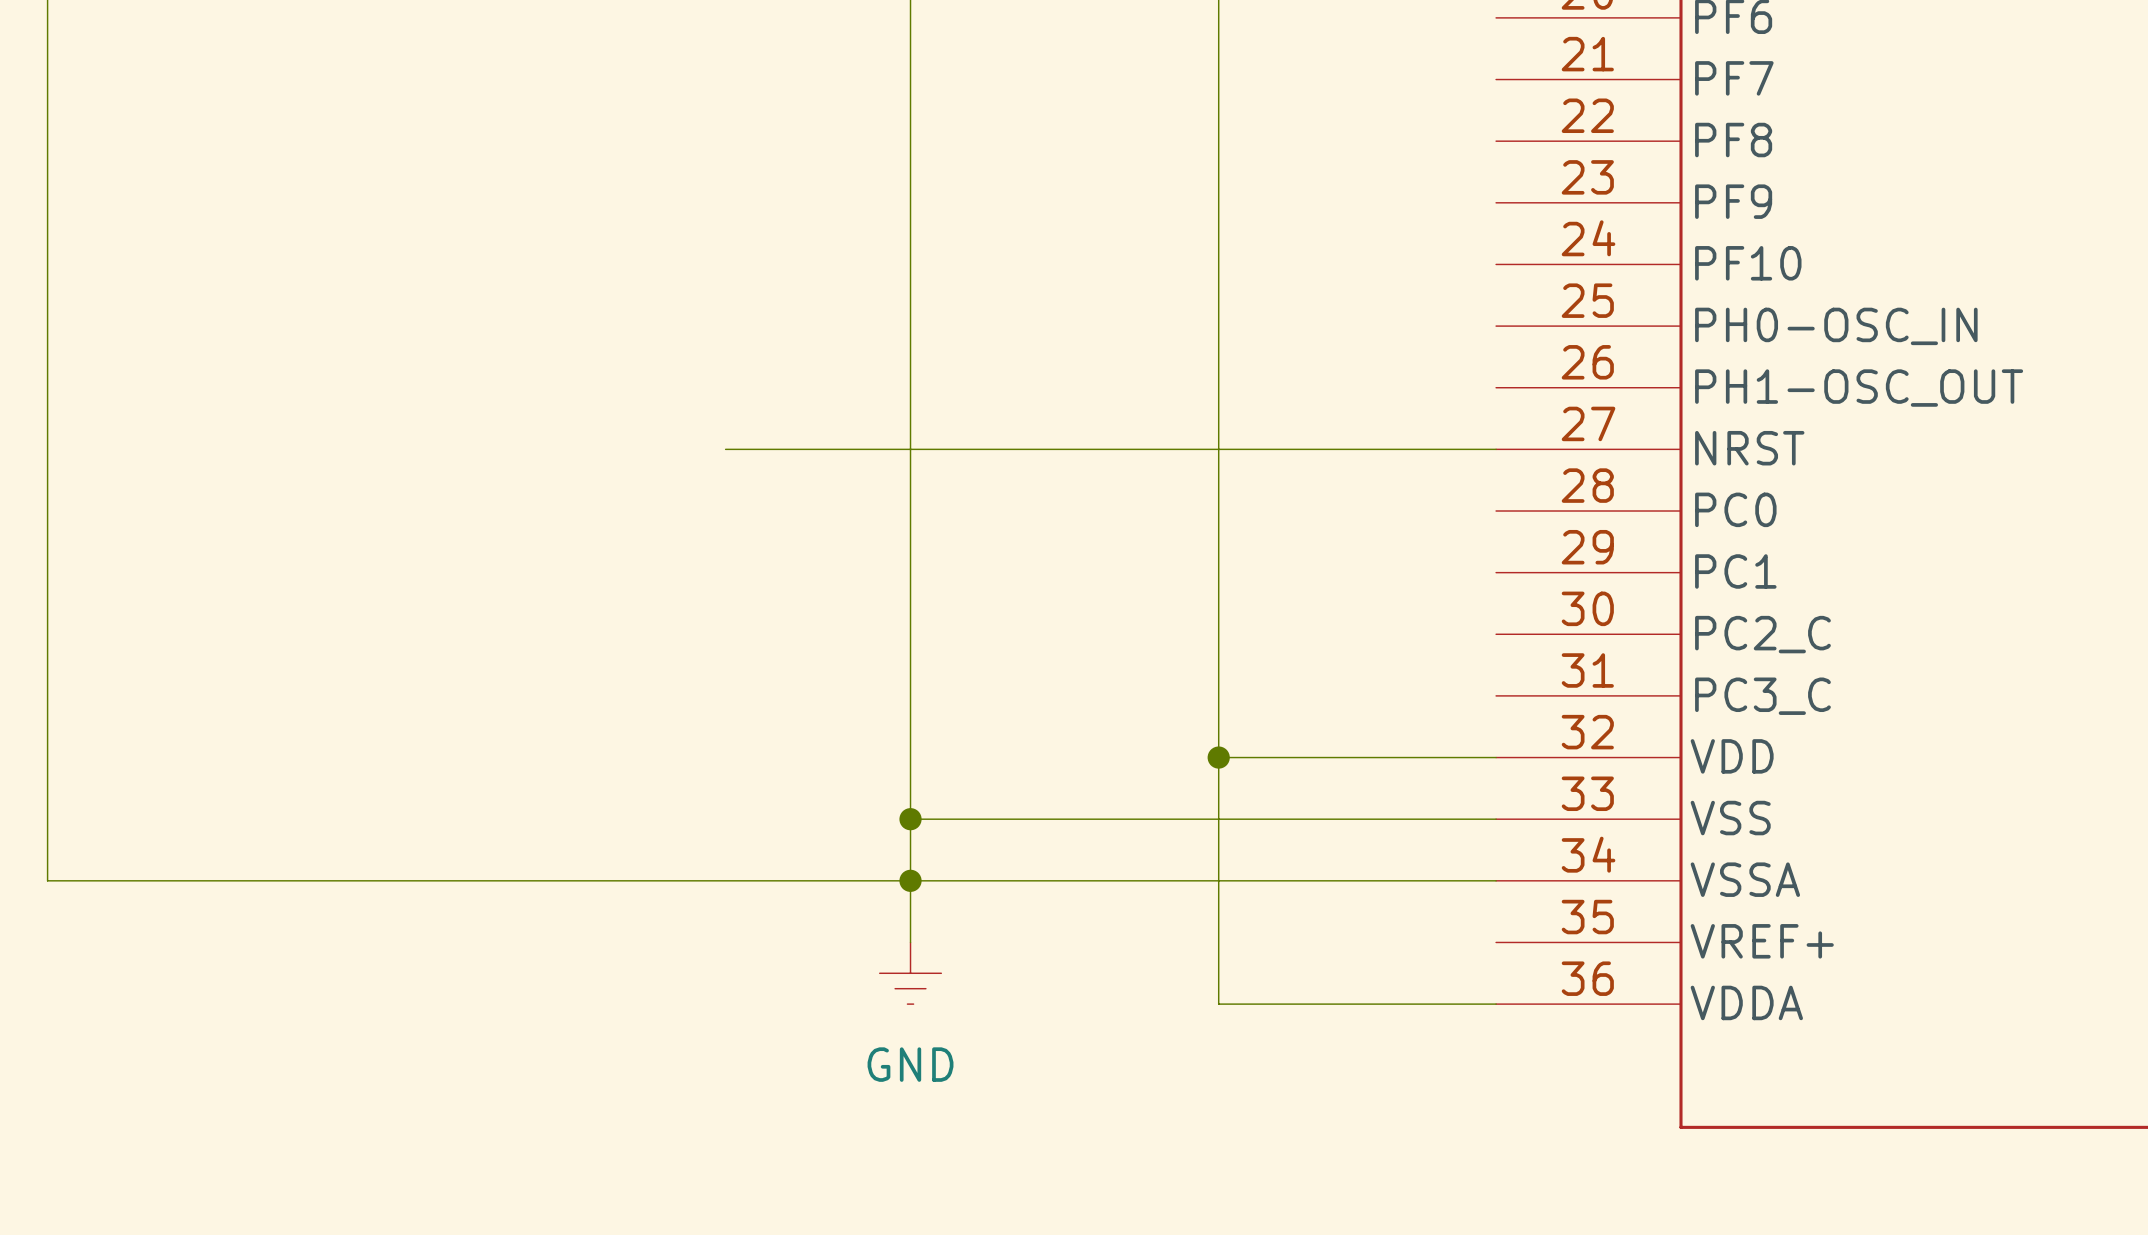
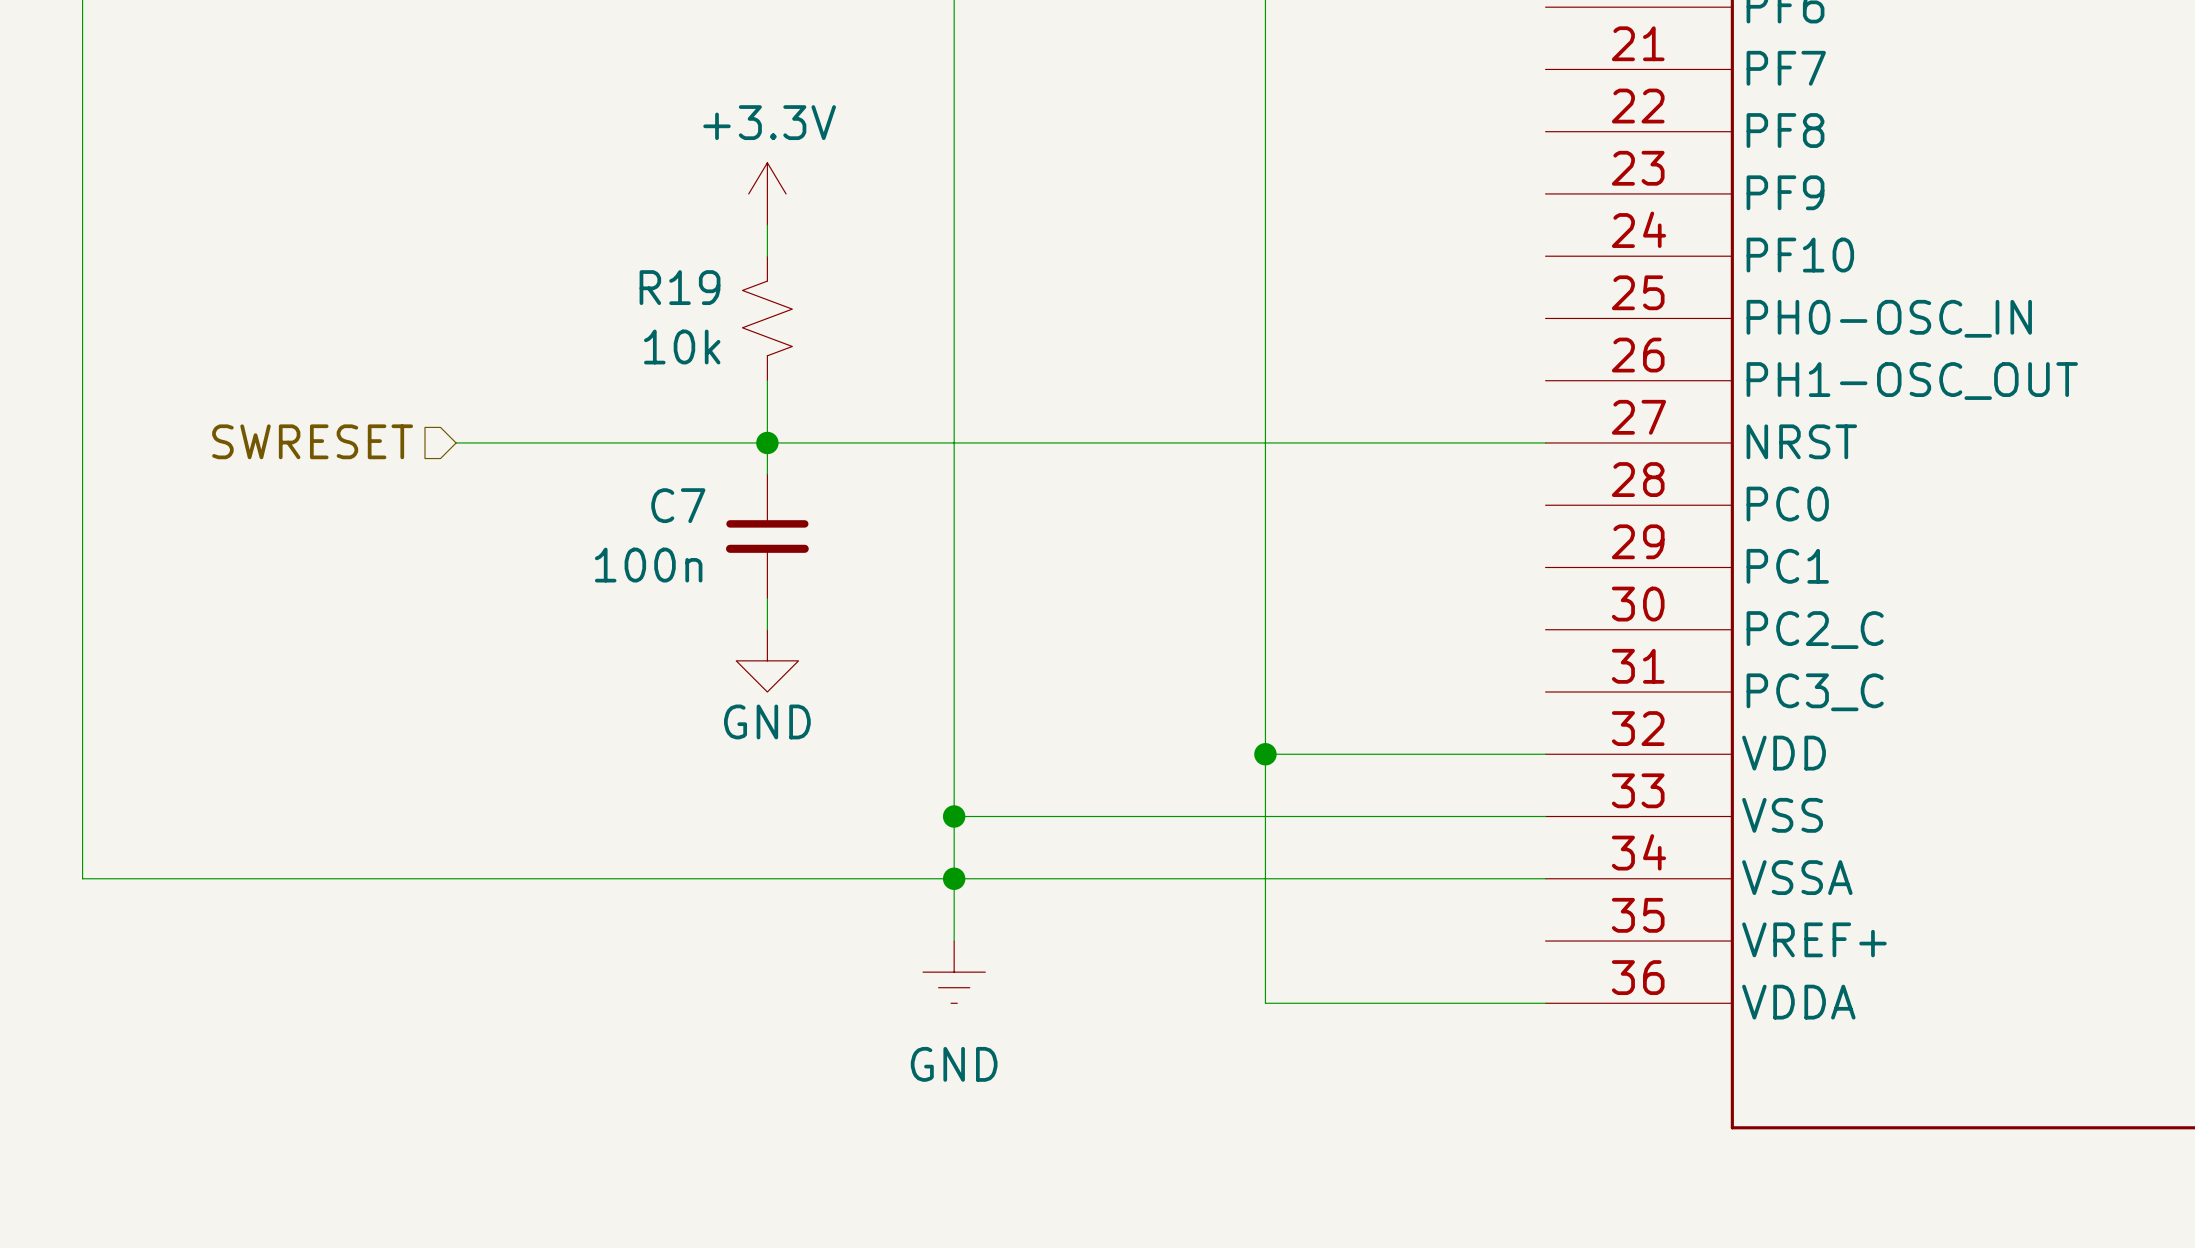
power symbol: none -> +3.3V (767, 193)
wire: none -> (767, 225) (767, 256)
R19: none -> 10k (767, 318)
wire: none -> (767, 380) (767, 474)
hierarchical label: none -> SWRESET (312, 441)
wire: none -> (456, 442) (767, 442)
junction: none -> (767, 442)
C7: none -> 100n (767, 536)
wire: none -> (767, 598) (767, 629)
power symbol: none -> GND (767, 660)

